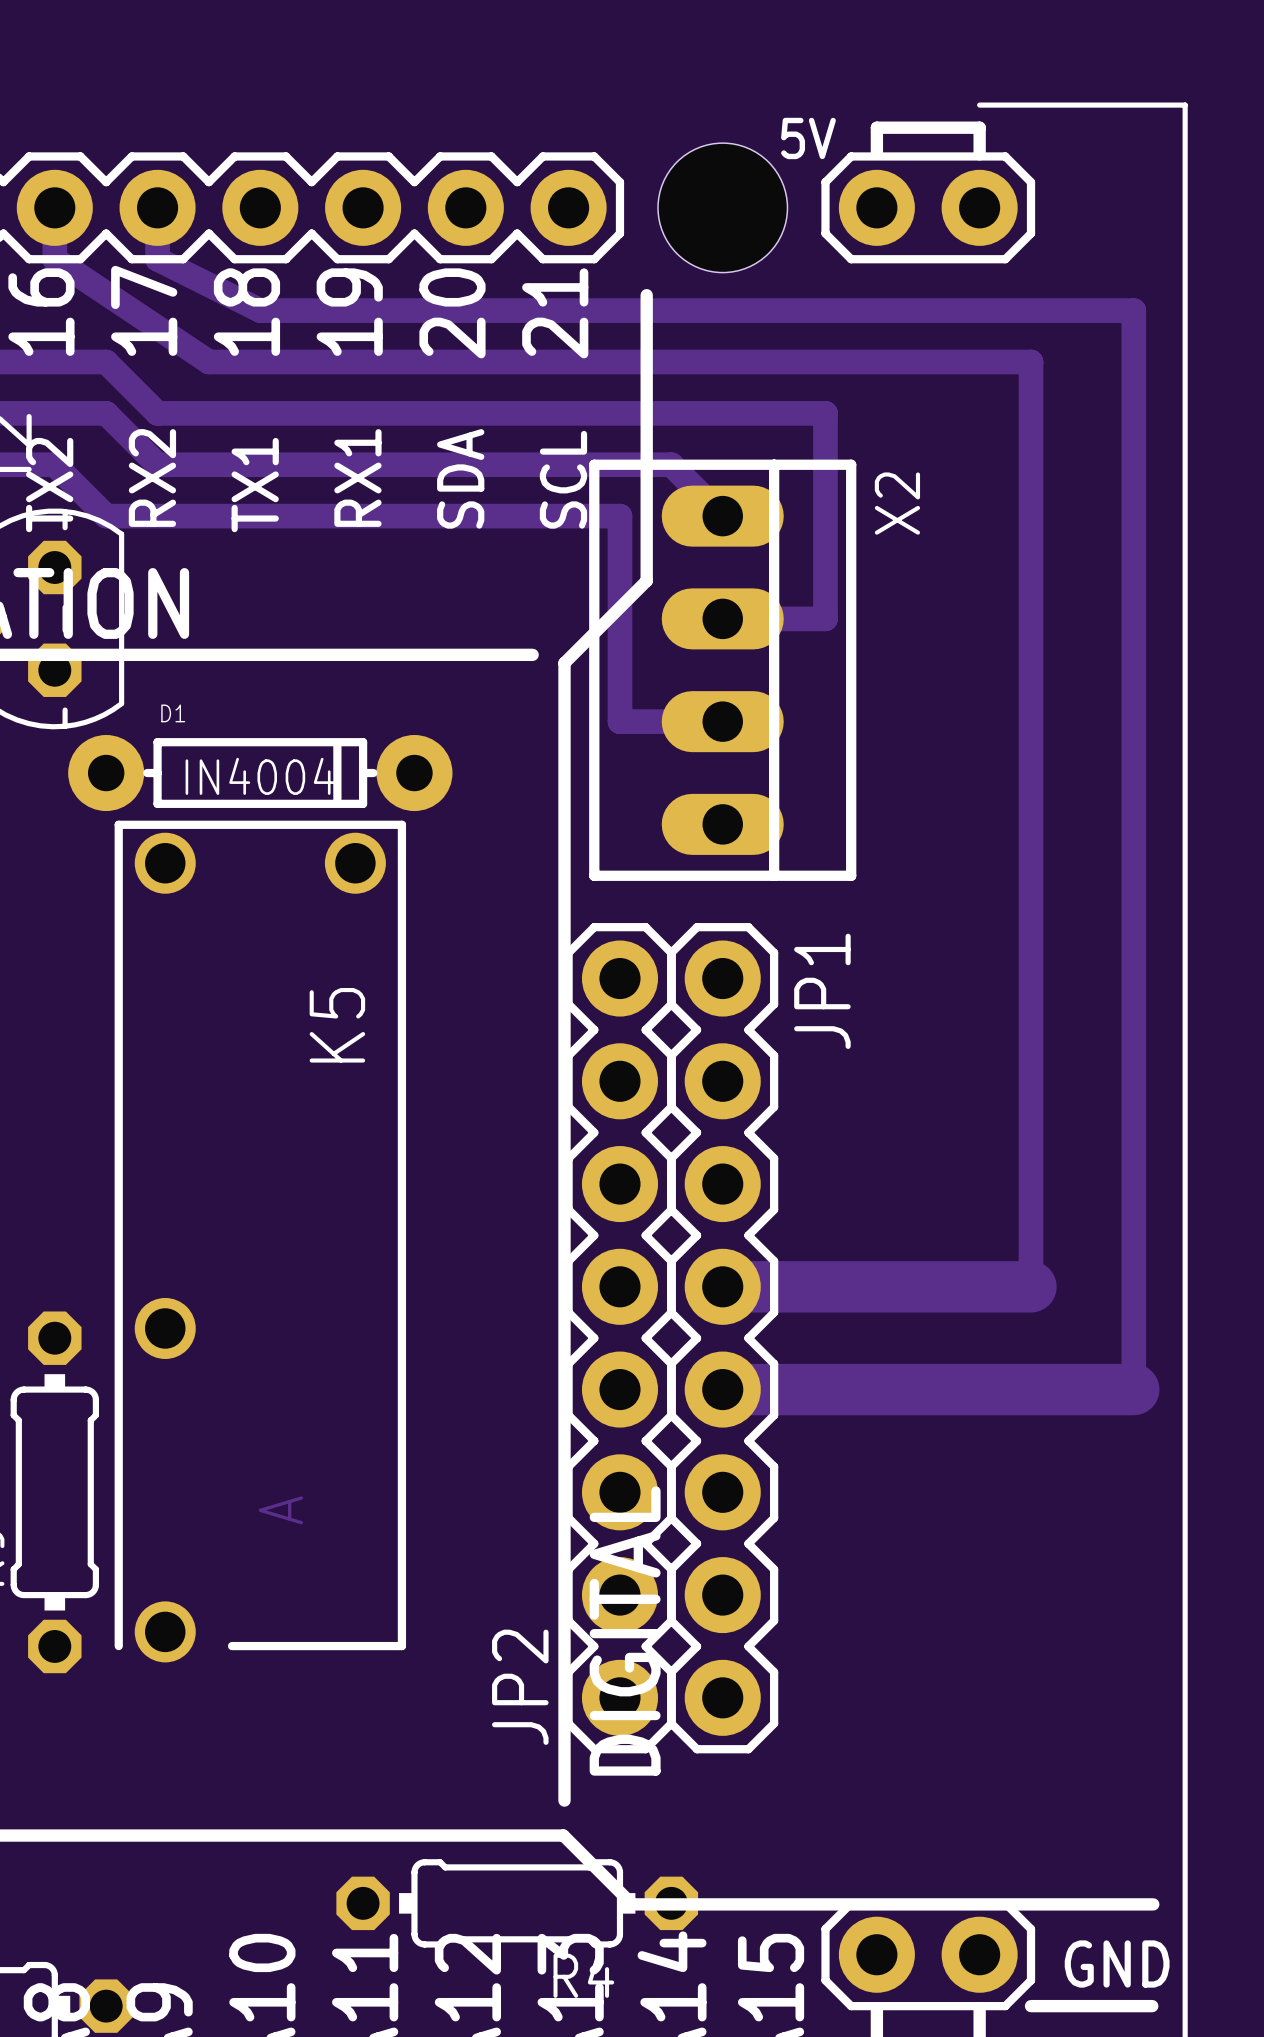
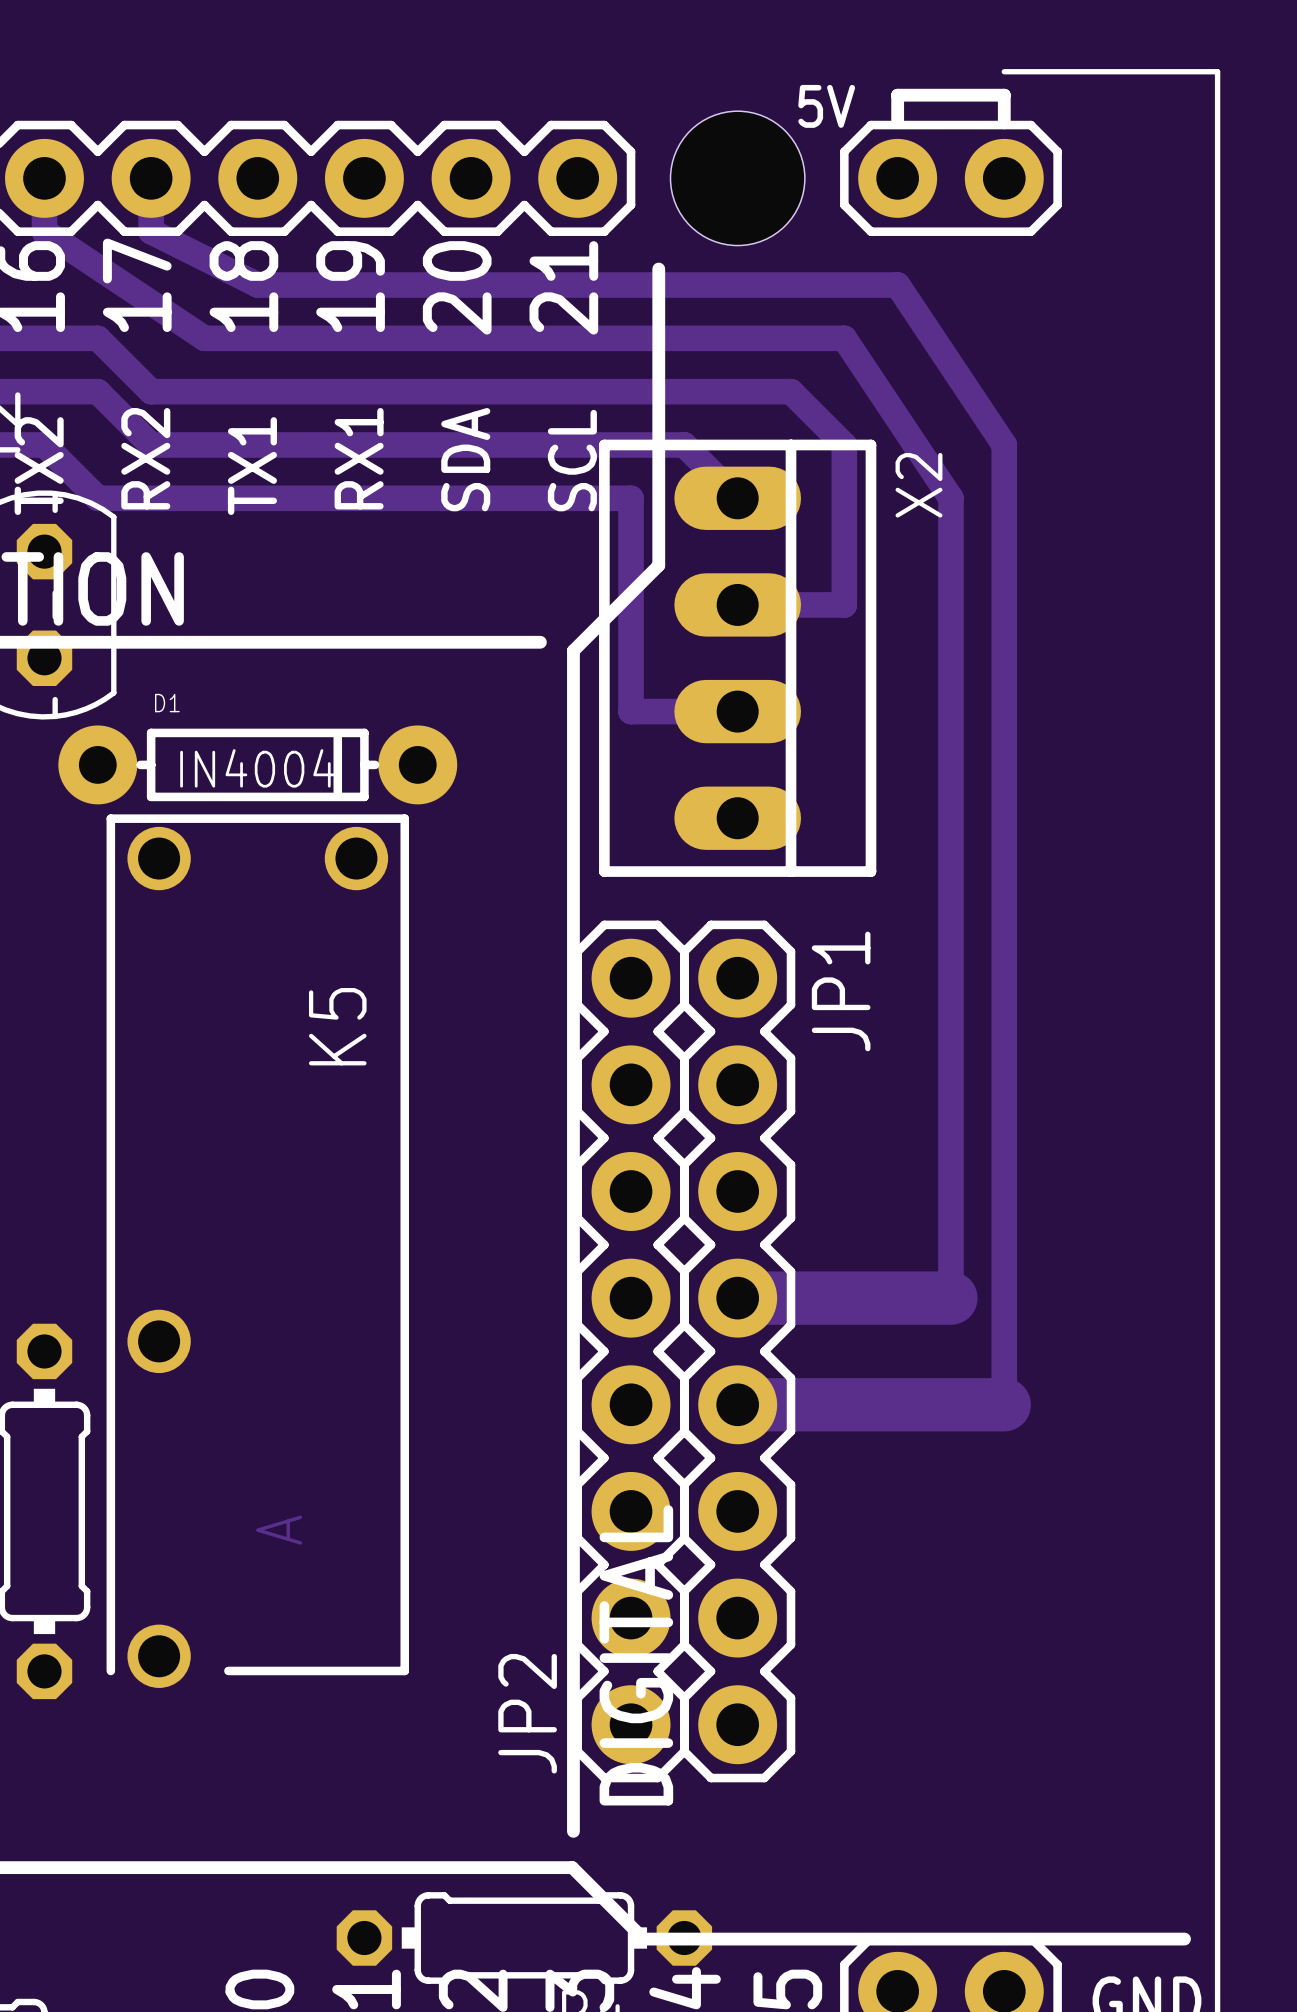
track: (876, 310) (1133, 310) (1133, 1389) (979, 1389) -> (897, 285) (1004, 444) (1004, 1404)
track: (825, 361) (1031, 361) (1031, 1286) (928, 1286) -> (844, 338) (950, 498) (950, 1298)
track: (774, 413) (825, 413) (825, 464) -> (791, 391) (844, 444)

